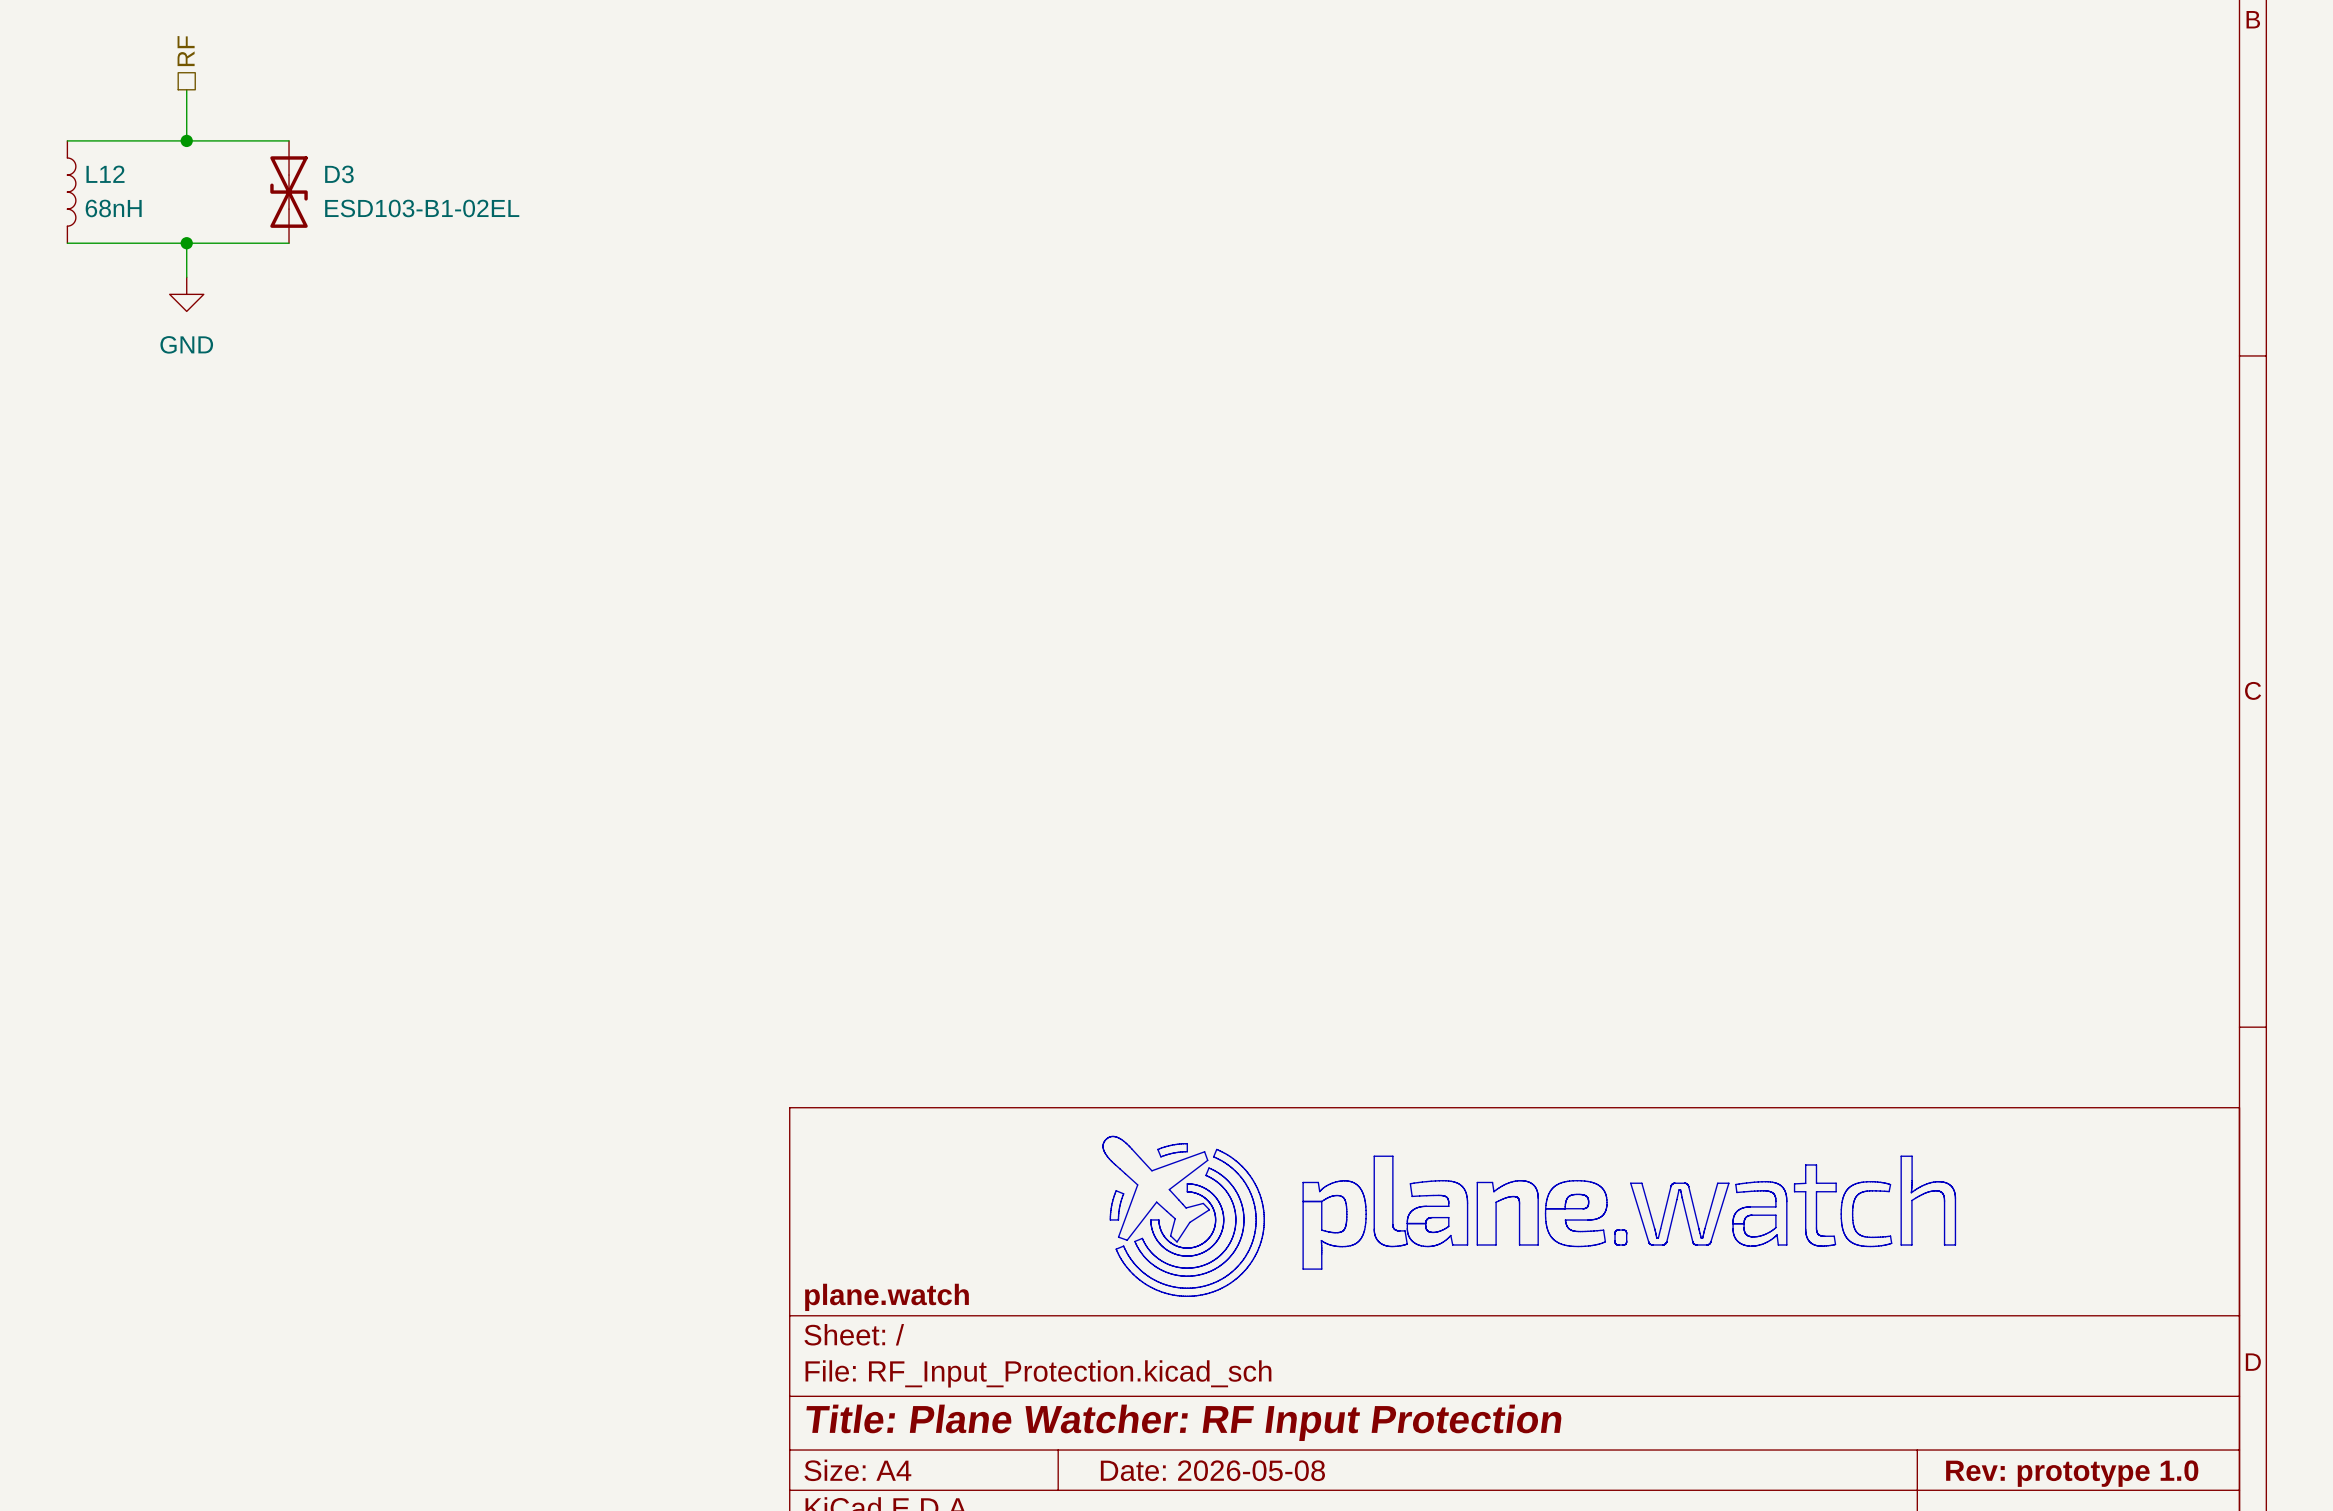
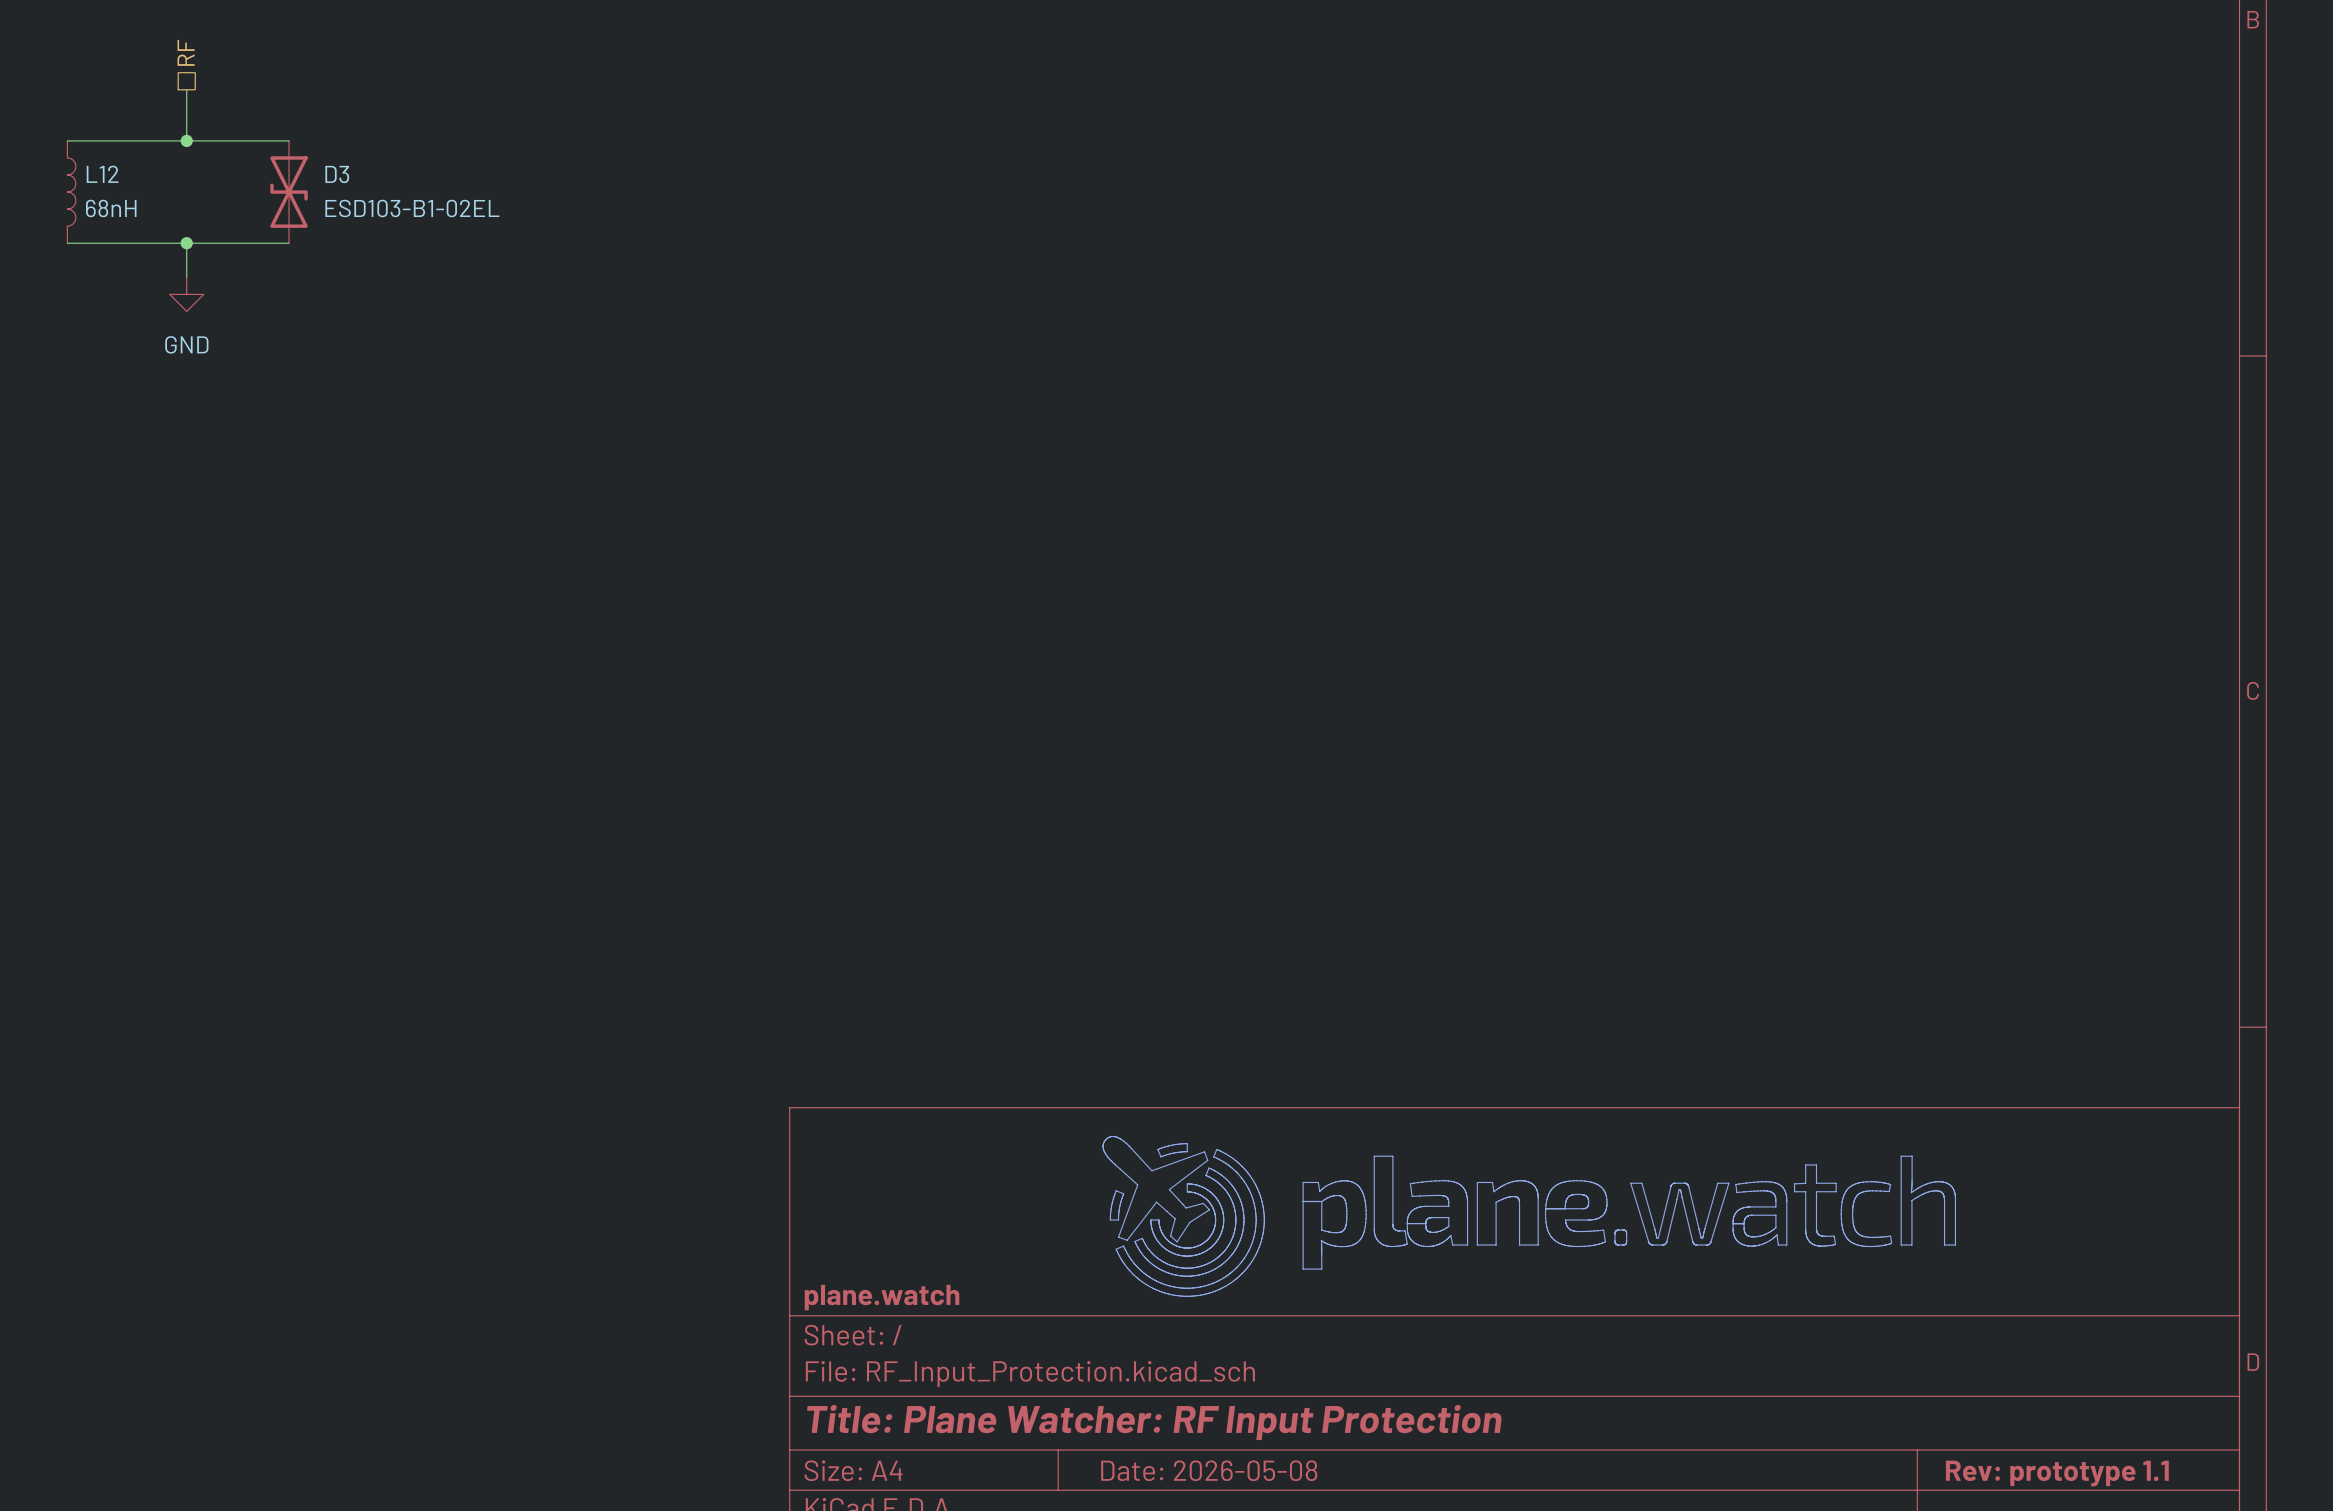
title block: Rev: prototype 1.0 (2072, 1473) -> Rev: prototype 1.1 (2057, 1473)

